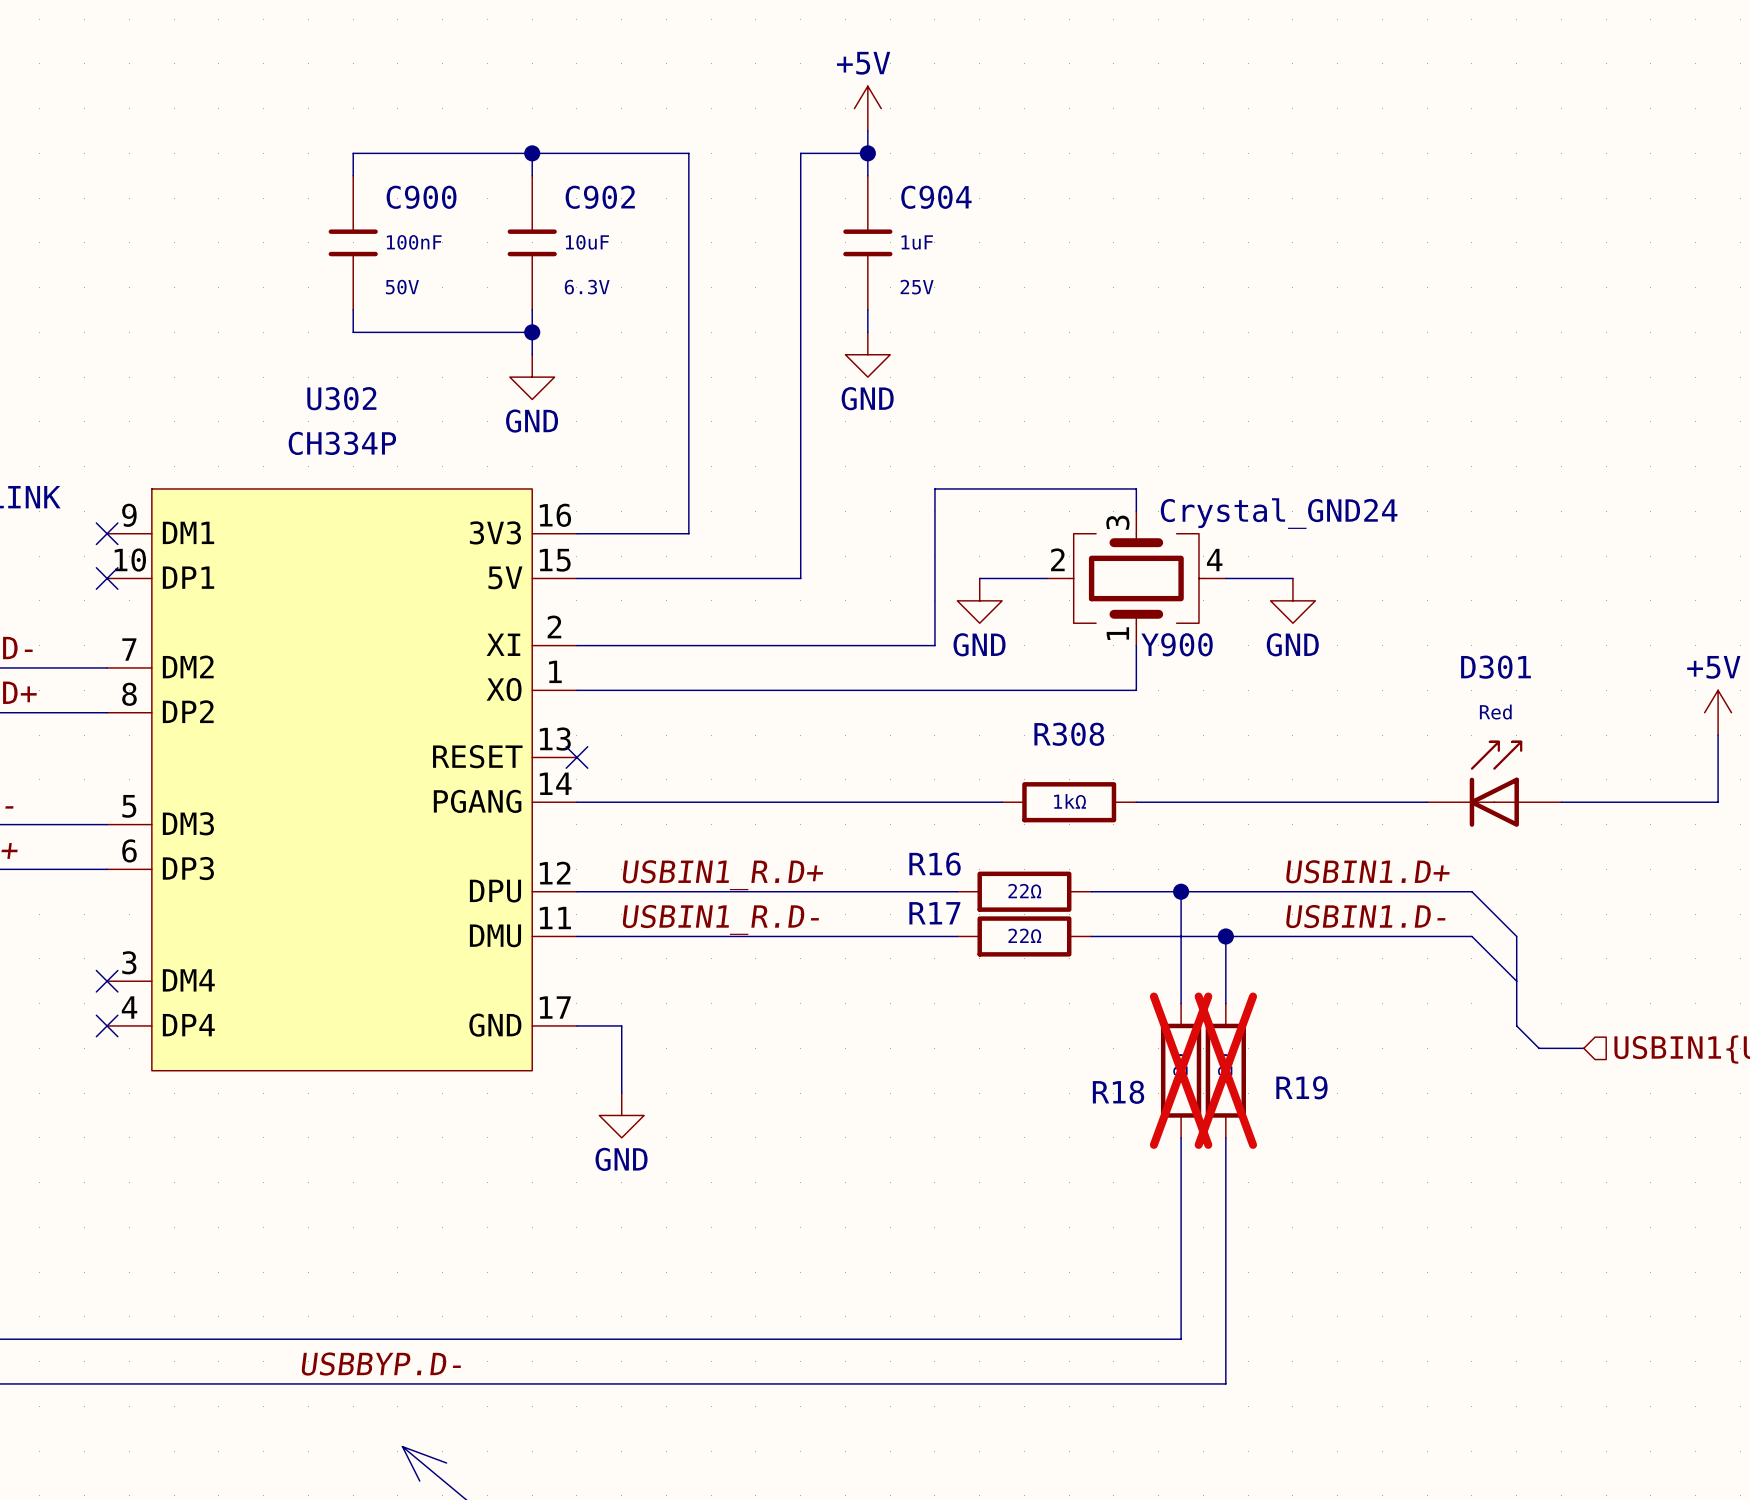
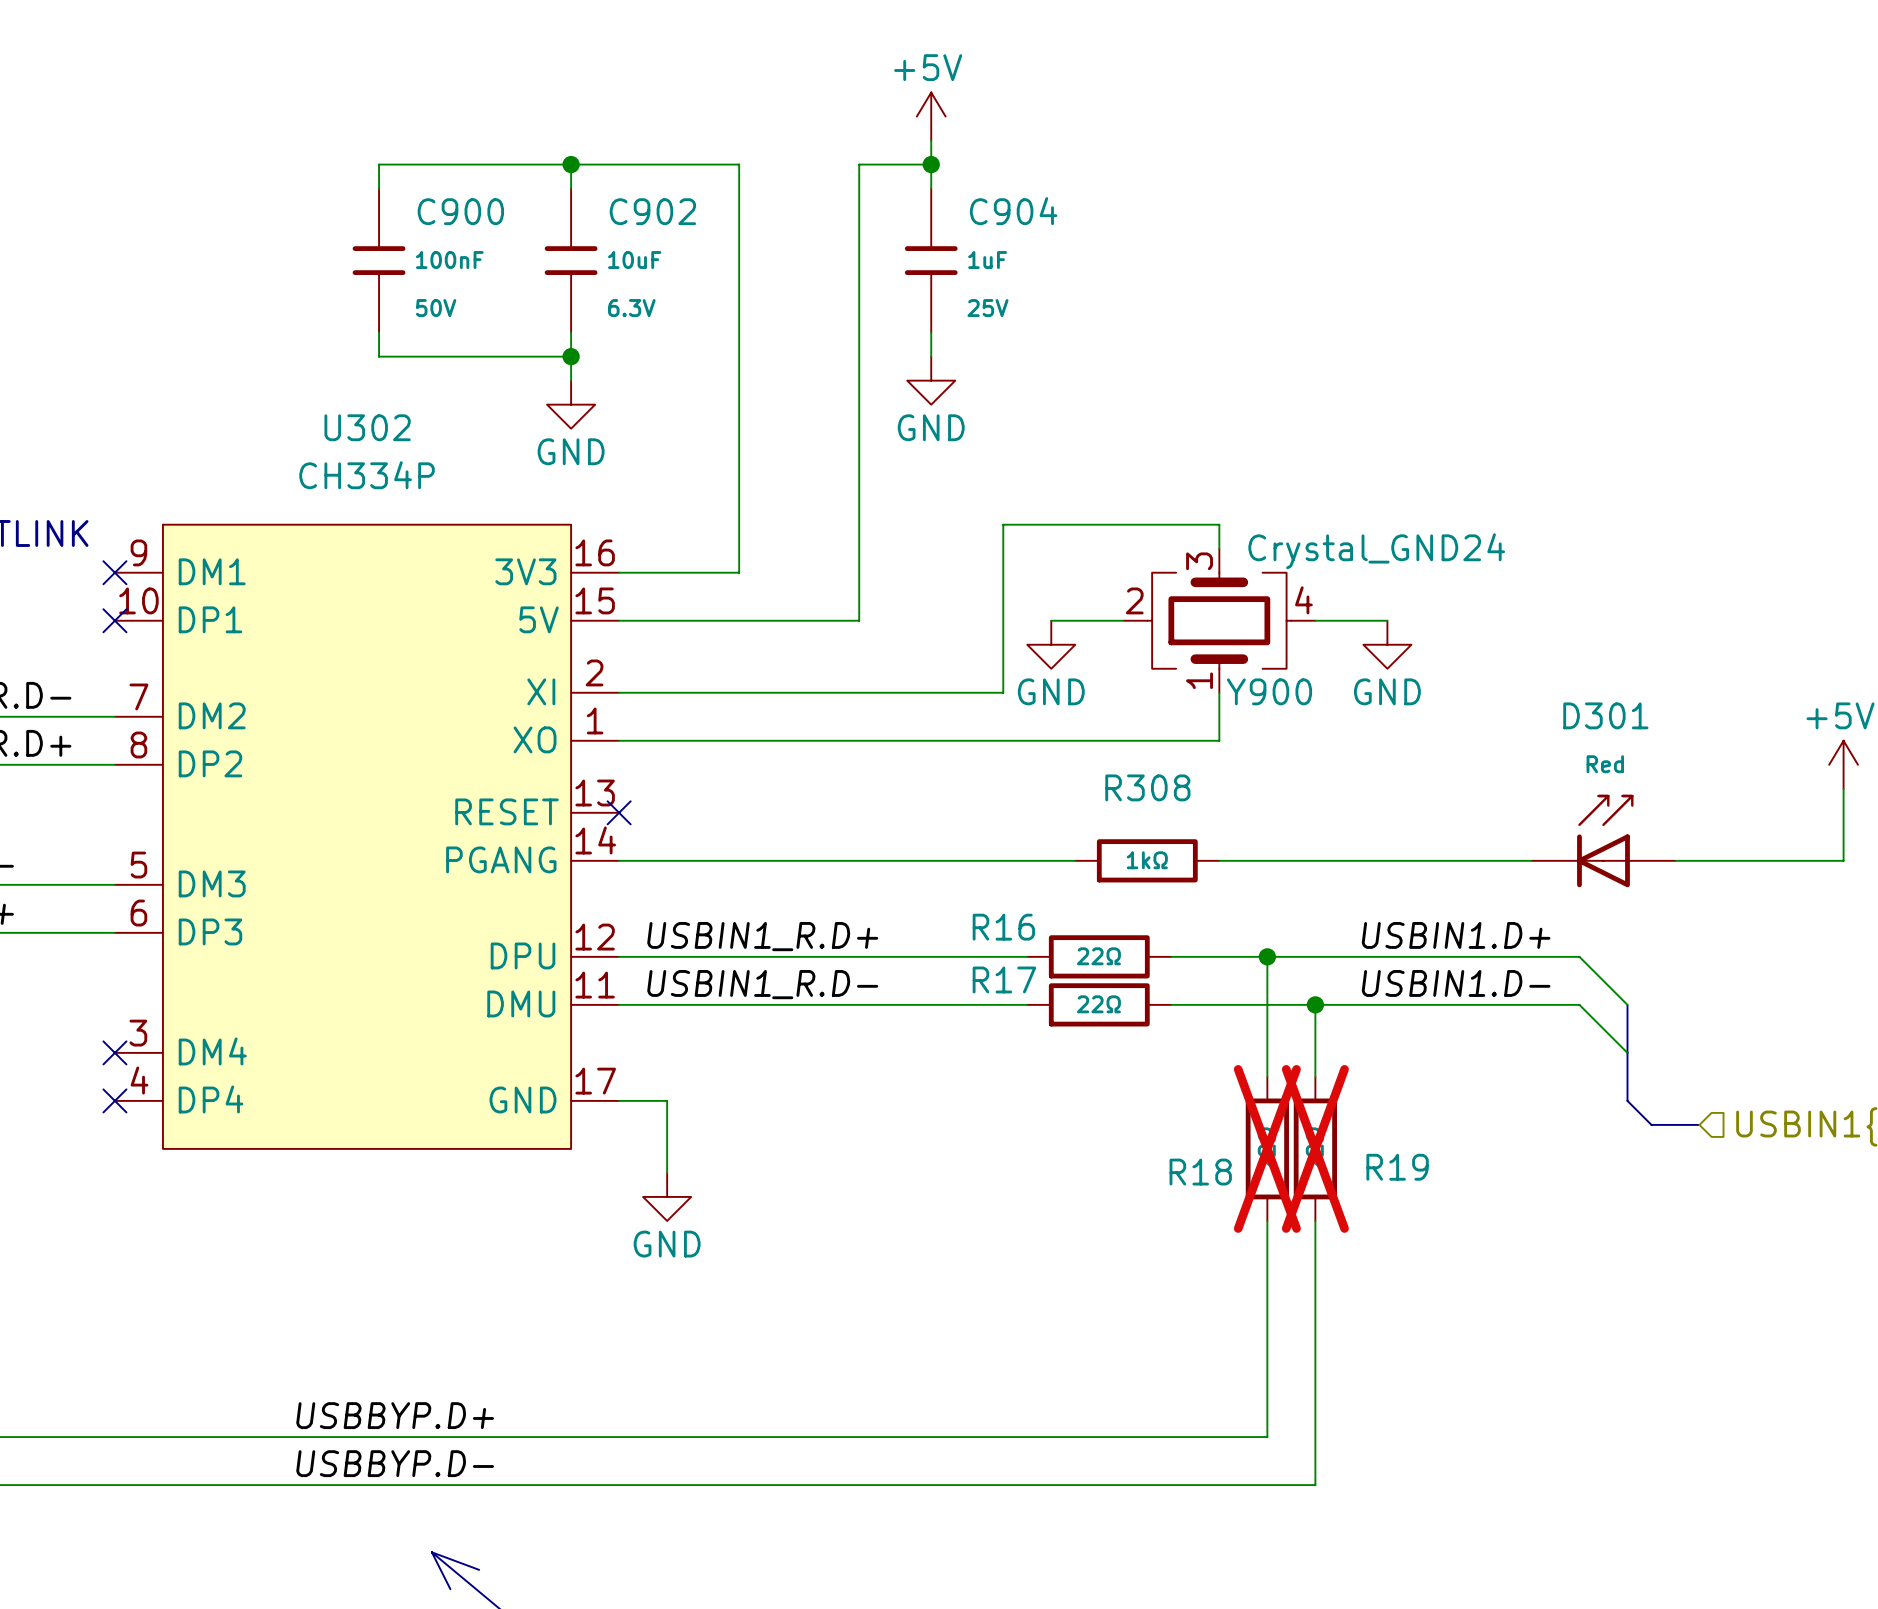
label: none -> USBBYP.D+ (395, 1415)

